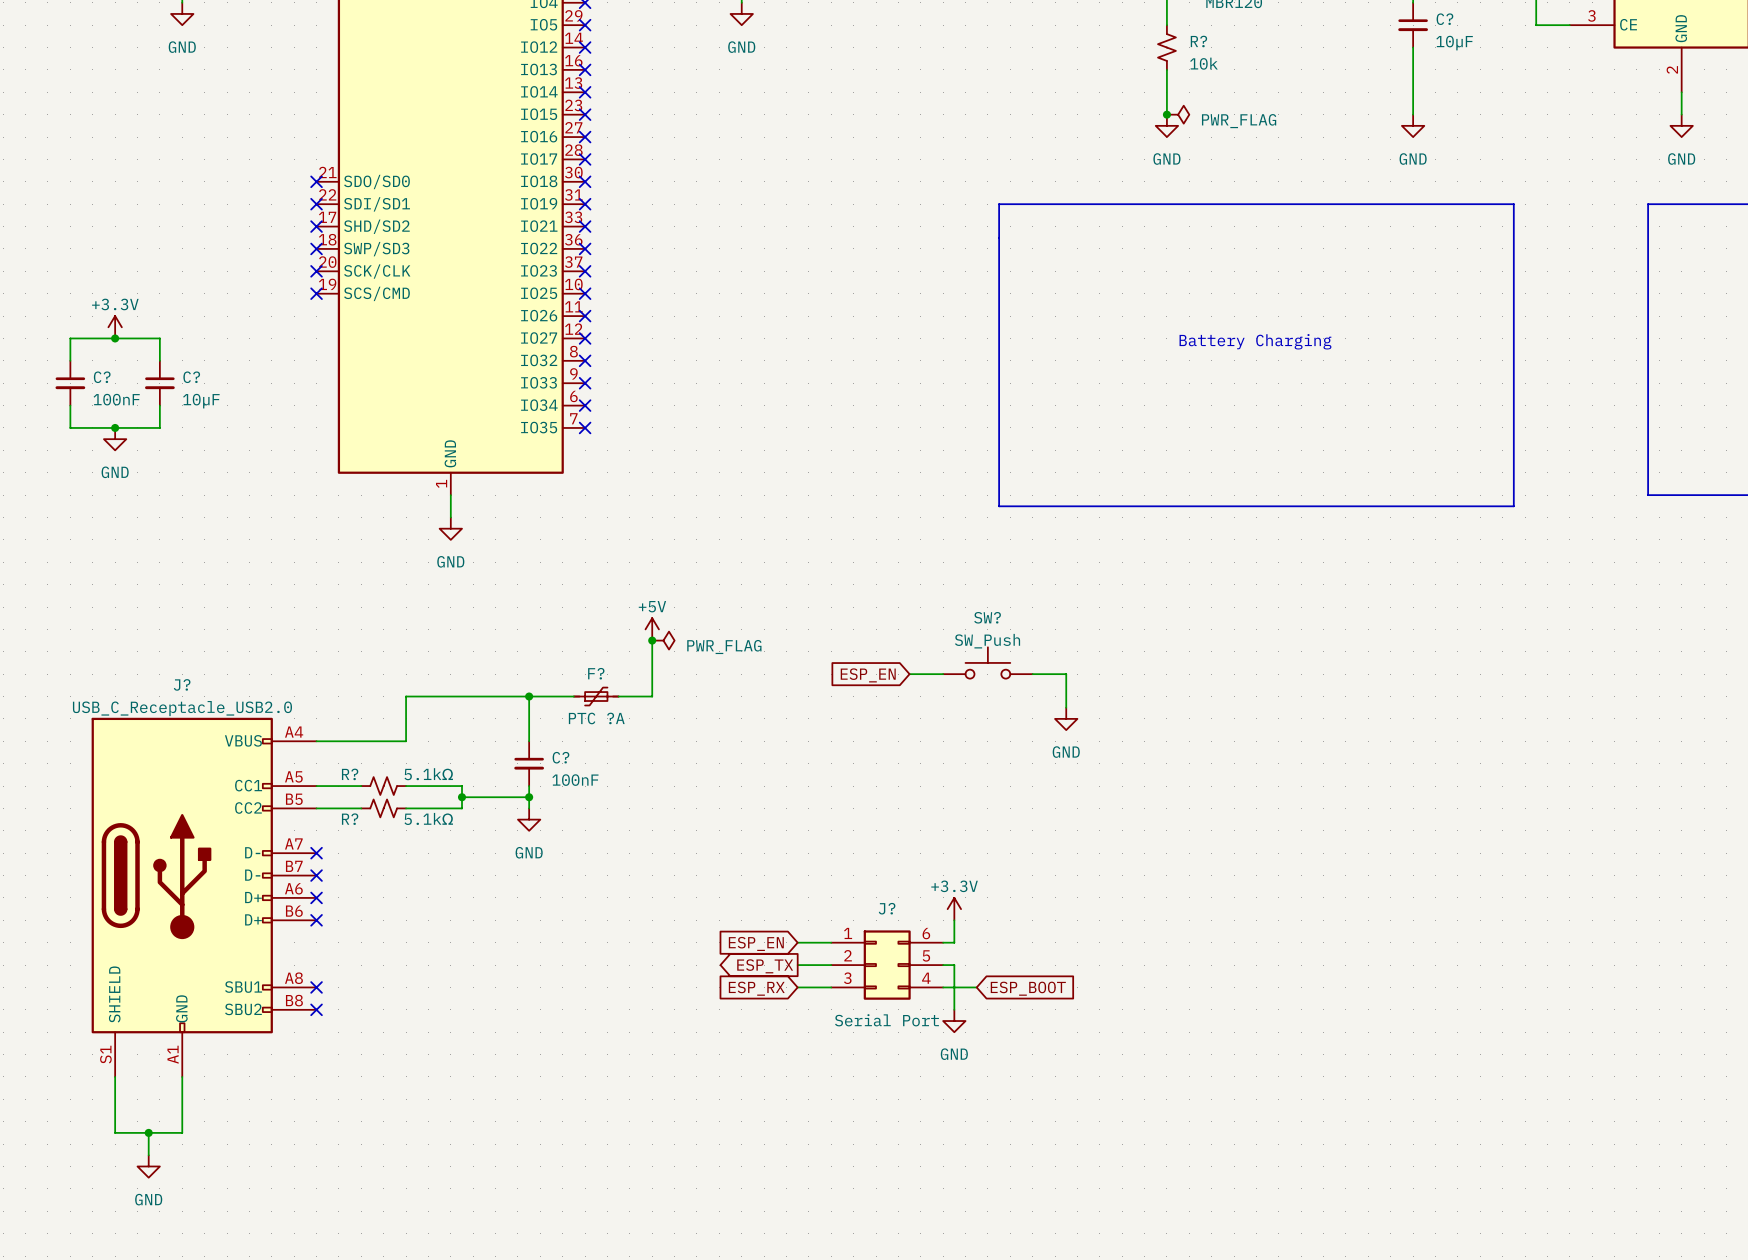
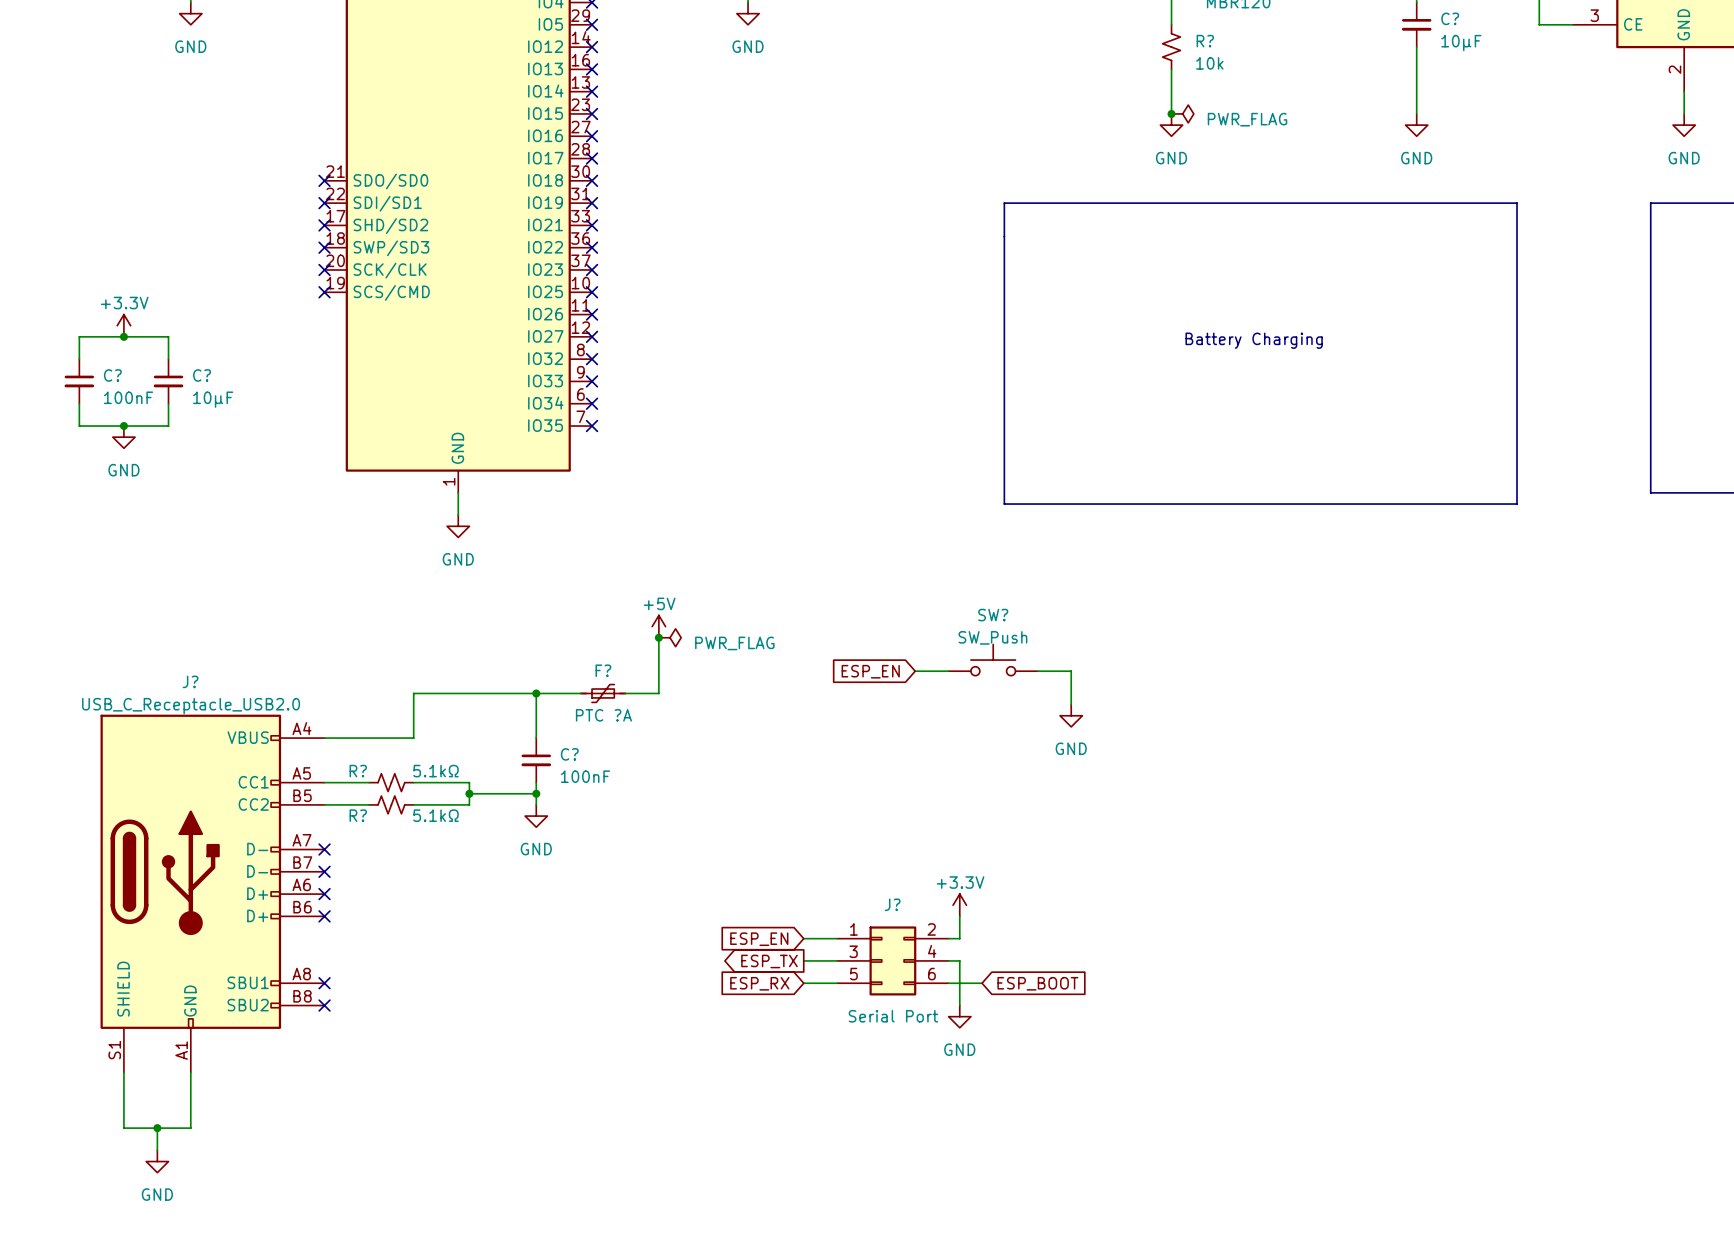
J? pin number: 6 (926, 933) -> 2 (931, 929)
J? pin number: 2 (848, 955) -> 3 (853, 951)
J? pin number: 5 (926, 955) -> 4 (932, 951)
J? pin number: 3 (847, 978) -> 5 (853, 974)
J? pin number: 4 (926, 978) -> 6 (931, 974)

